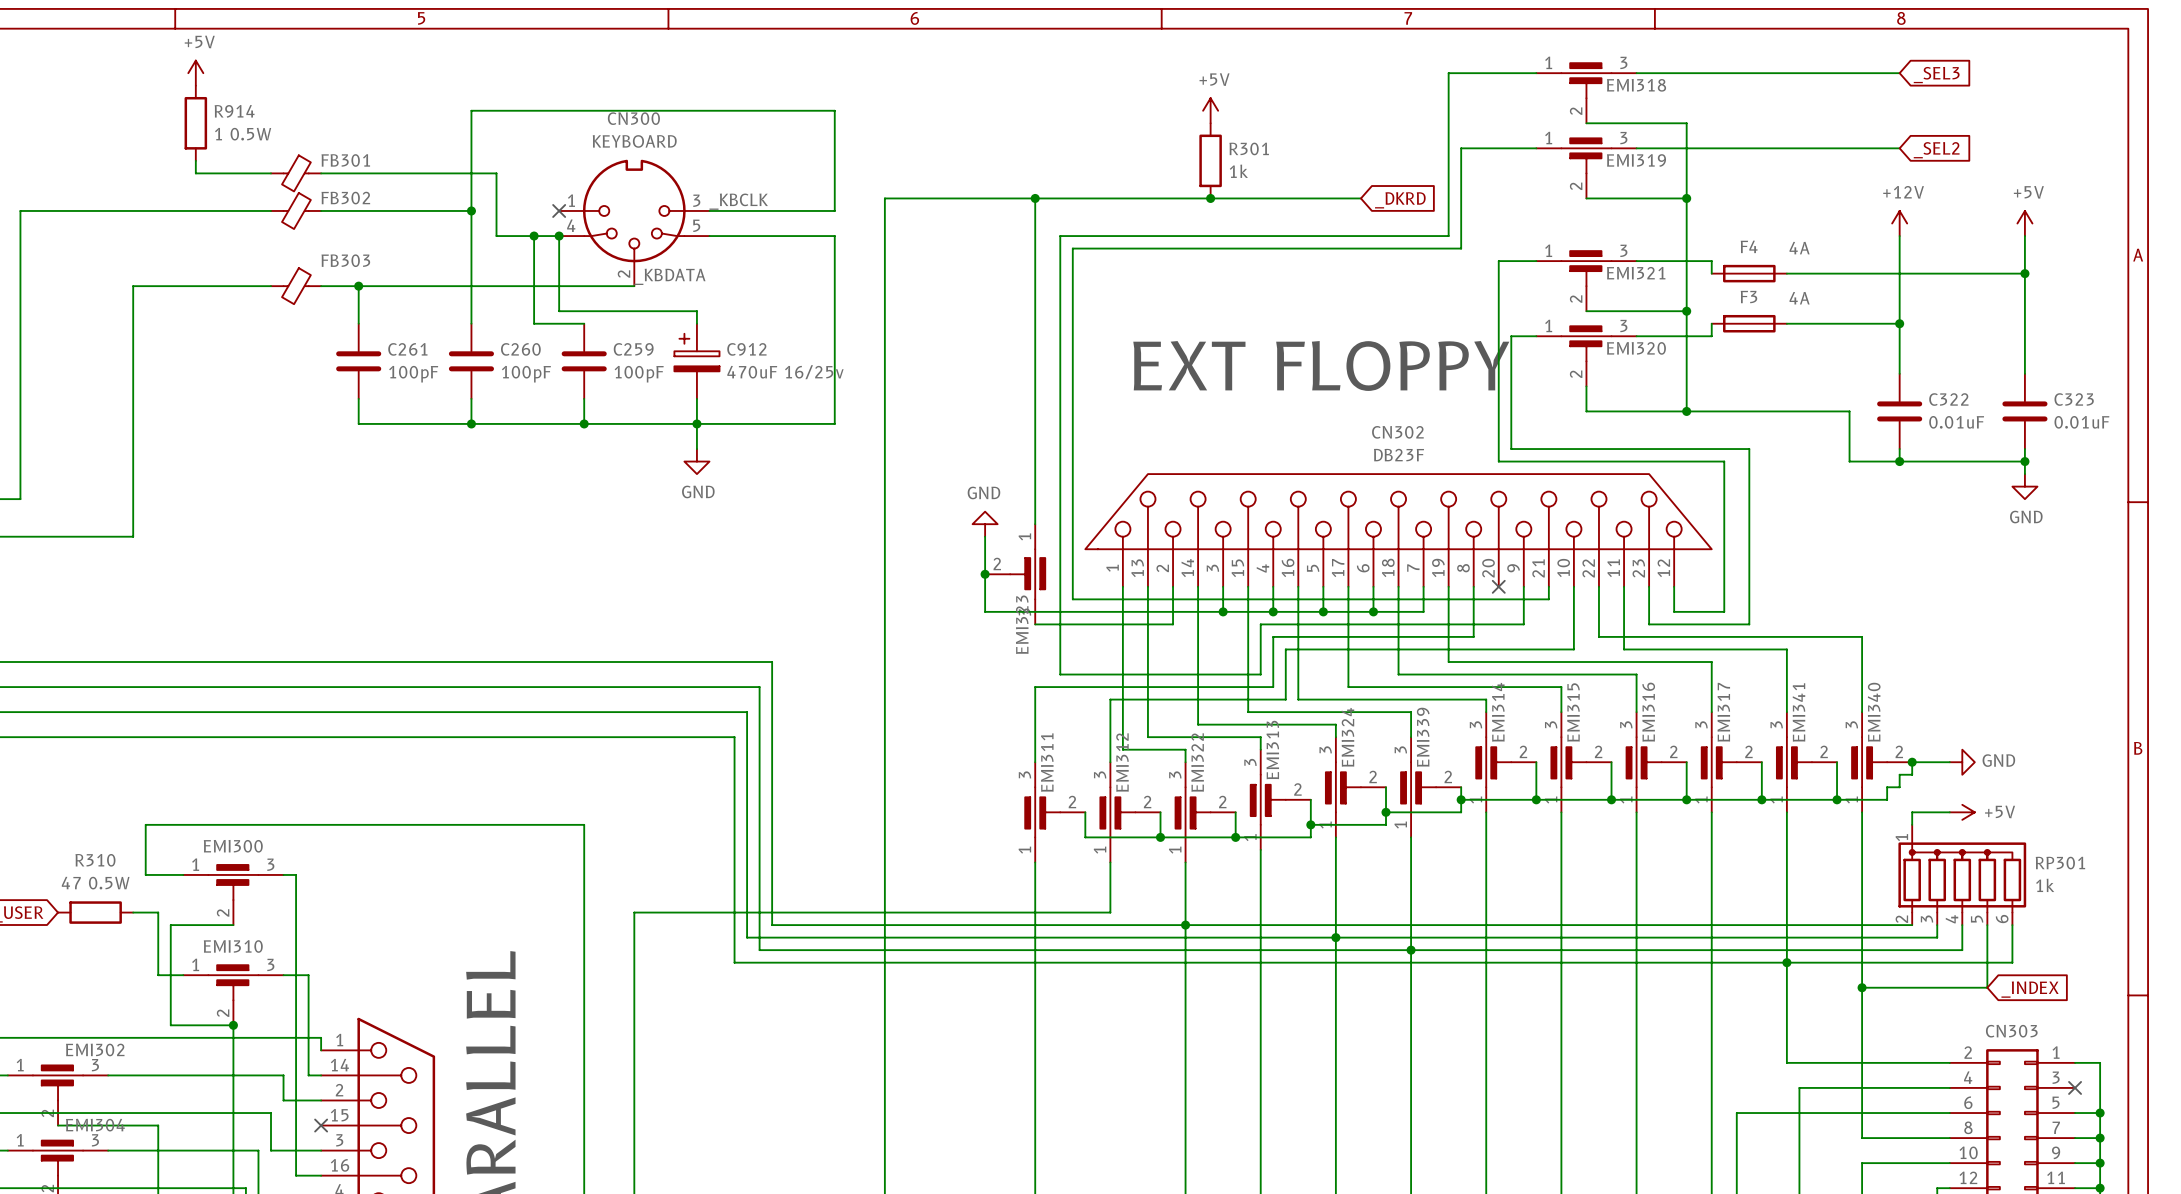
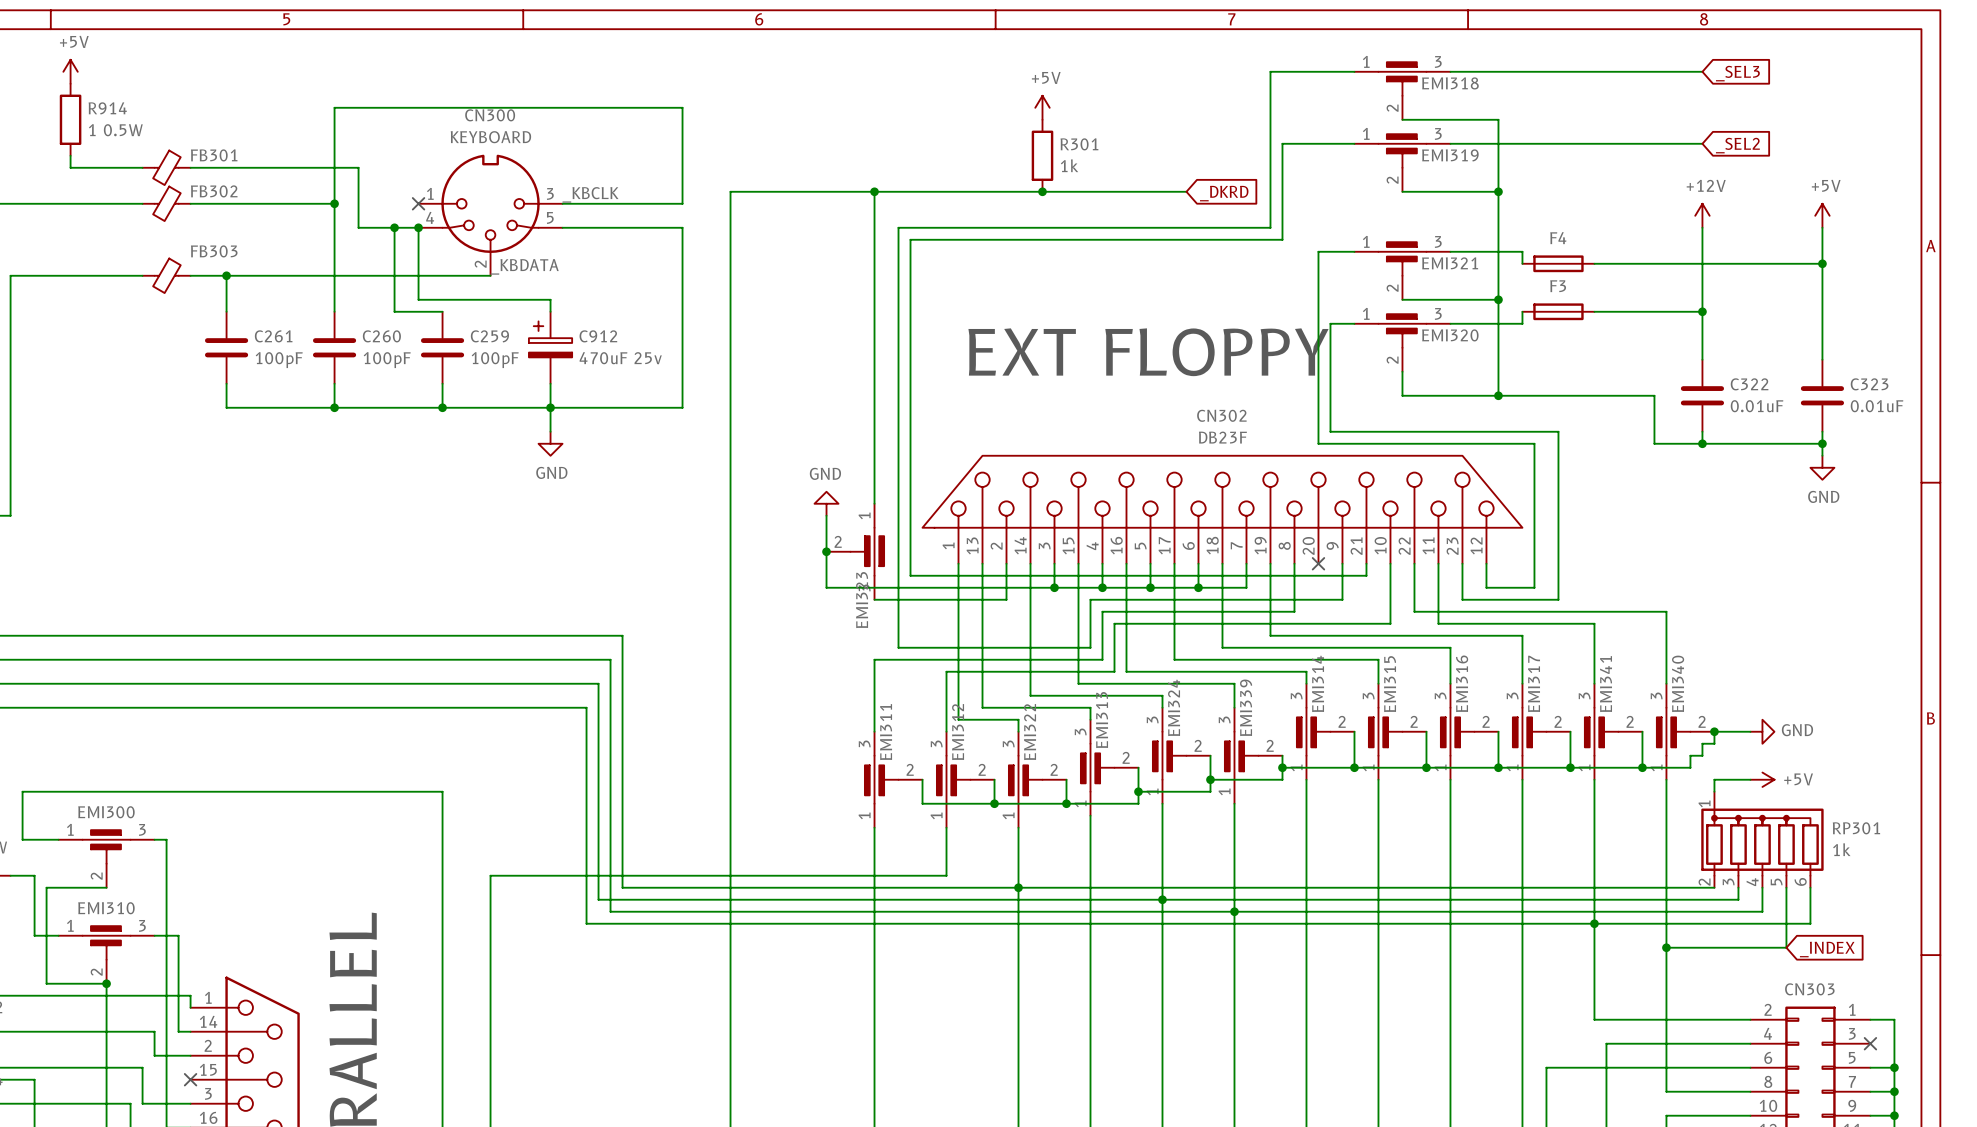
F4 value: 4A (1799, 248) -> none
F3 value: 4A (1799, 298) -> none
C912 value: 470uF 16/25v (785, 372) -> 470uF 25v (620, 358)

